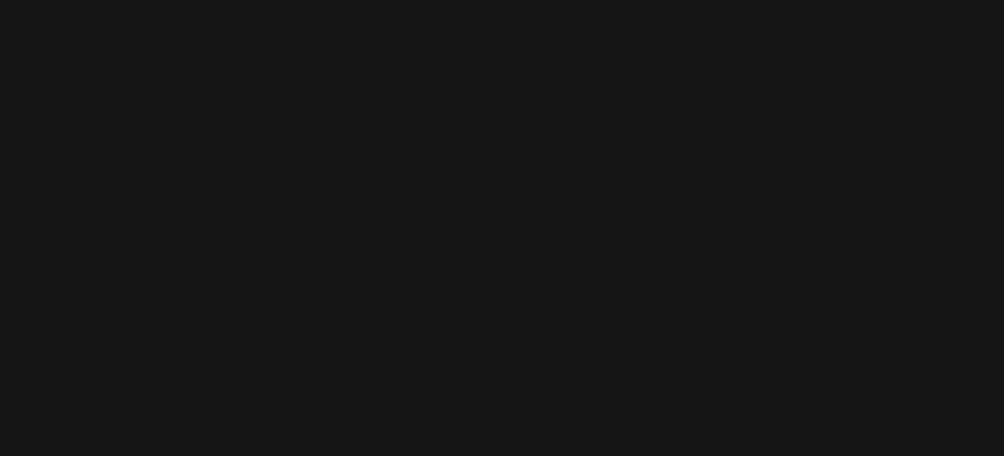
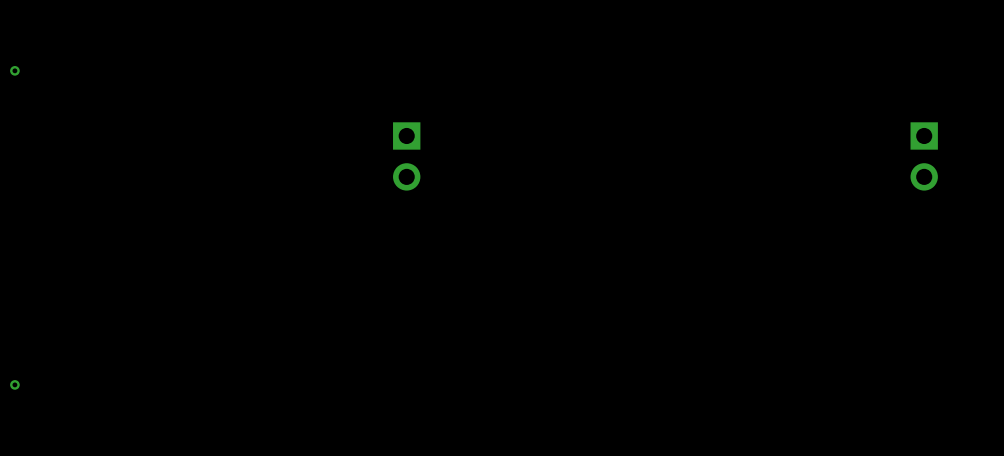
via: none -> (14, 70)
part: none -> (406, 156)
part: none -> (924, 156)
via: none -> (14, 384)

